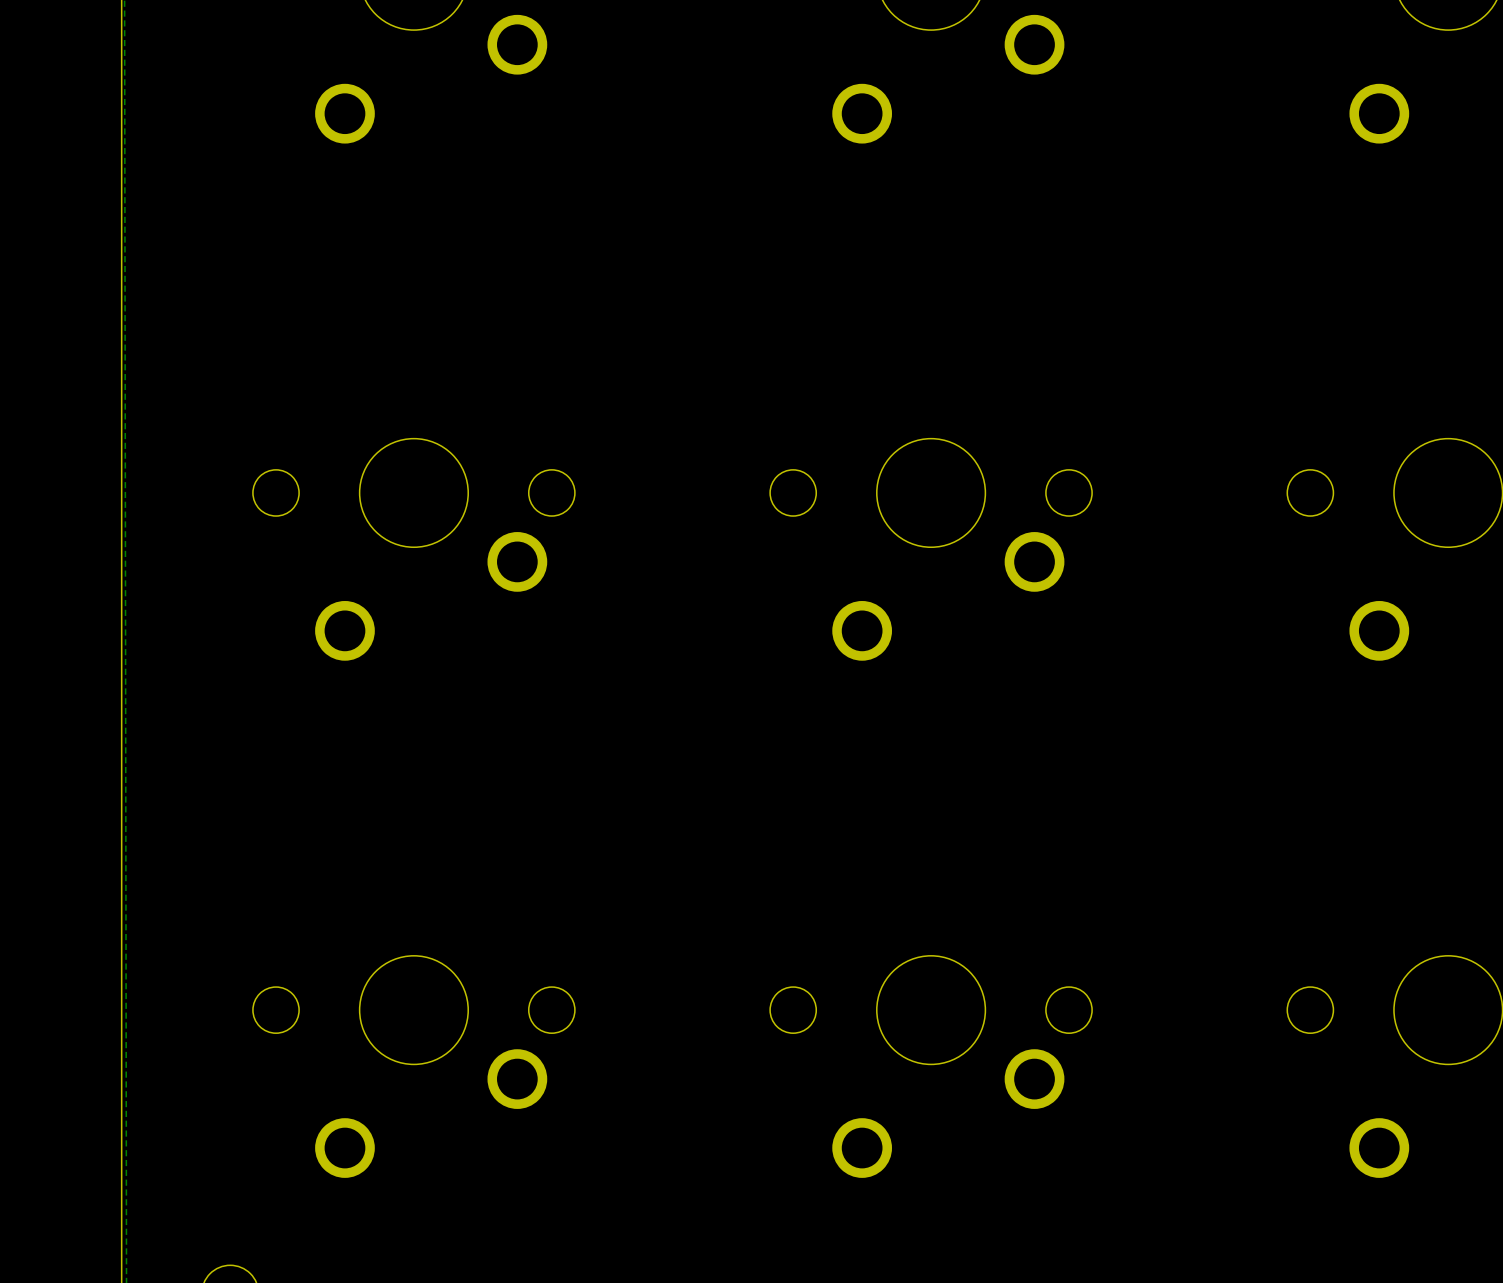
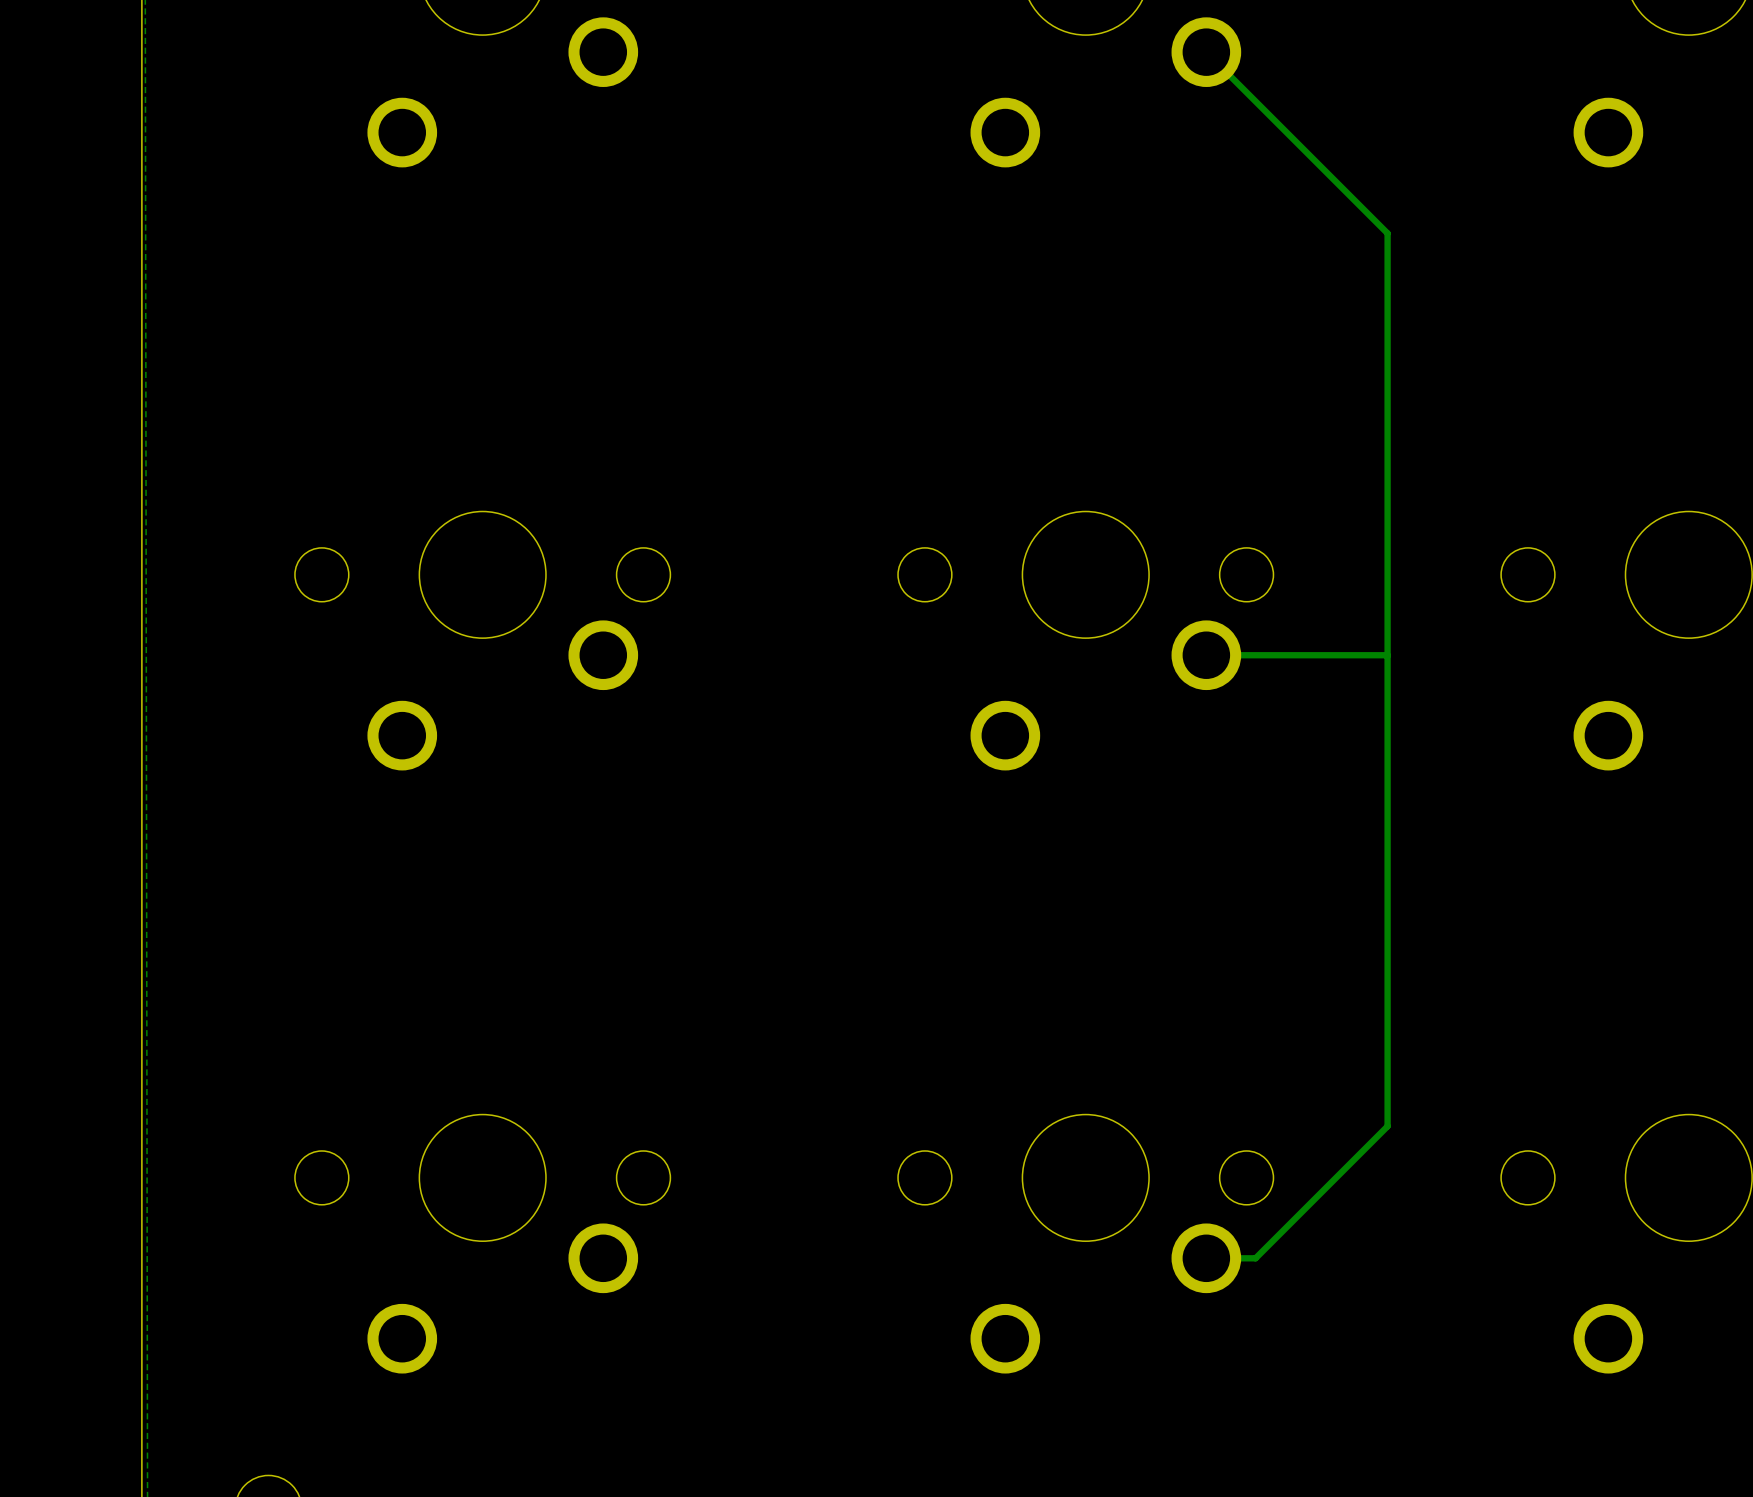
track: none -> (1206, 52) (1387, 233) (1387, 1126) (1255, 1258) (1206, 1258)
track: none -> (1387, 655) (1206, 655)

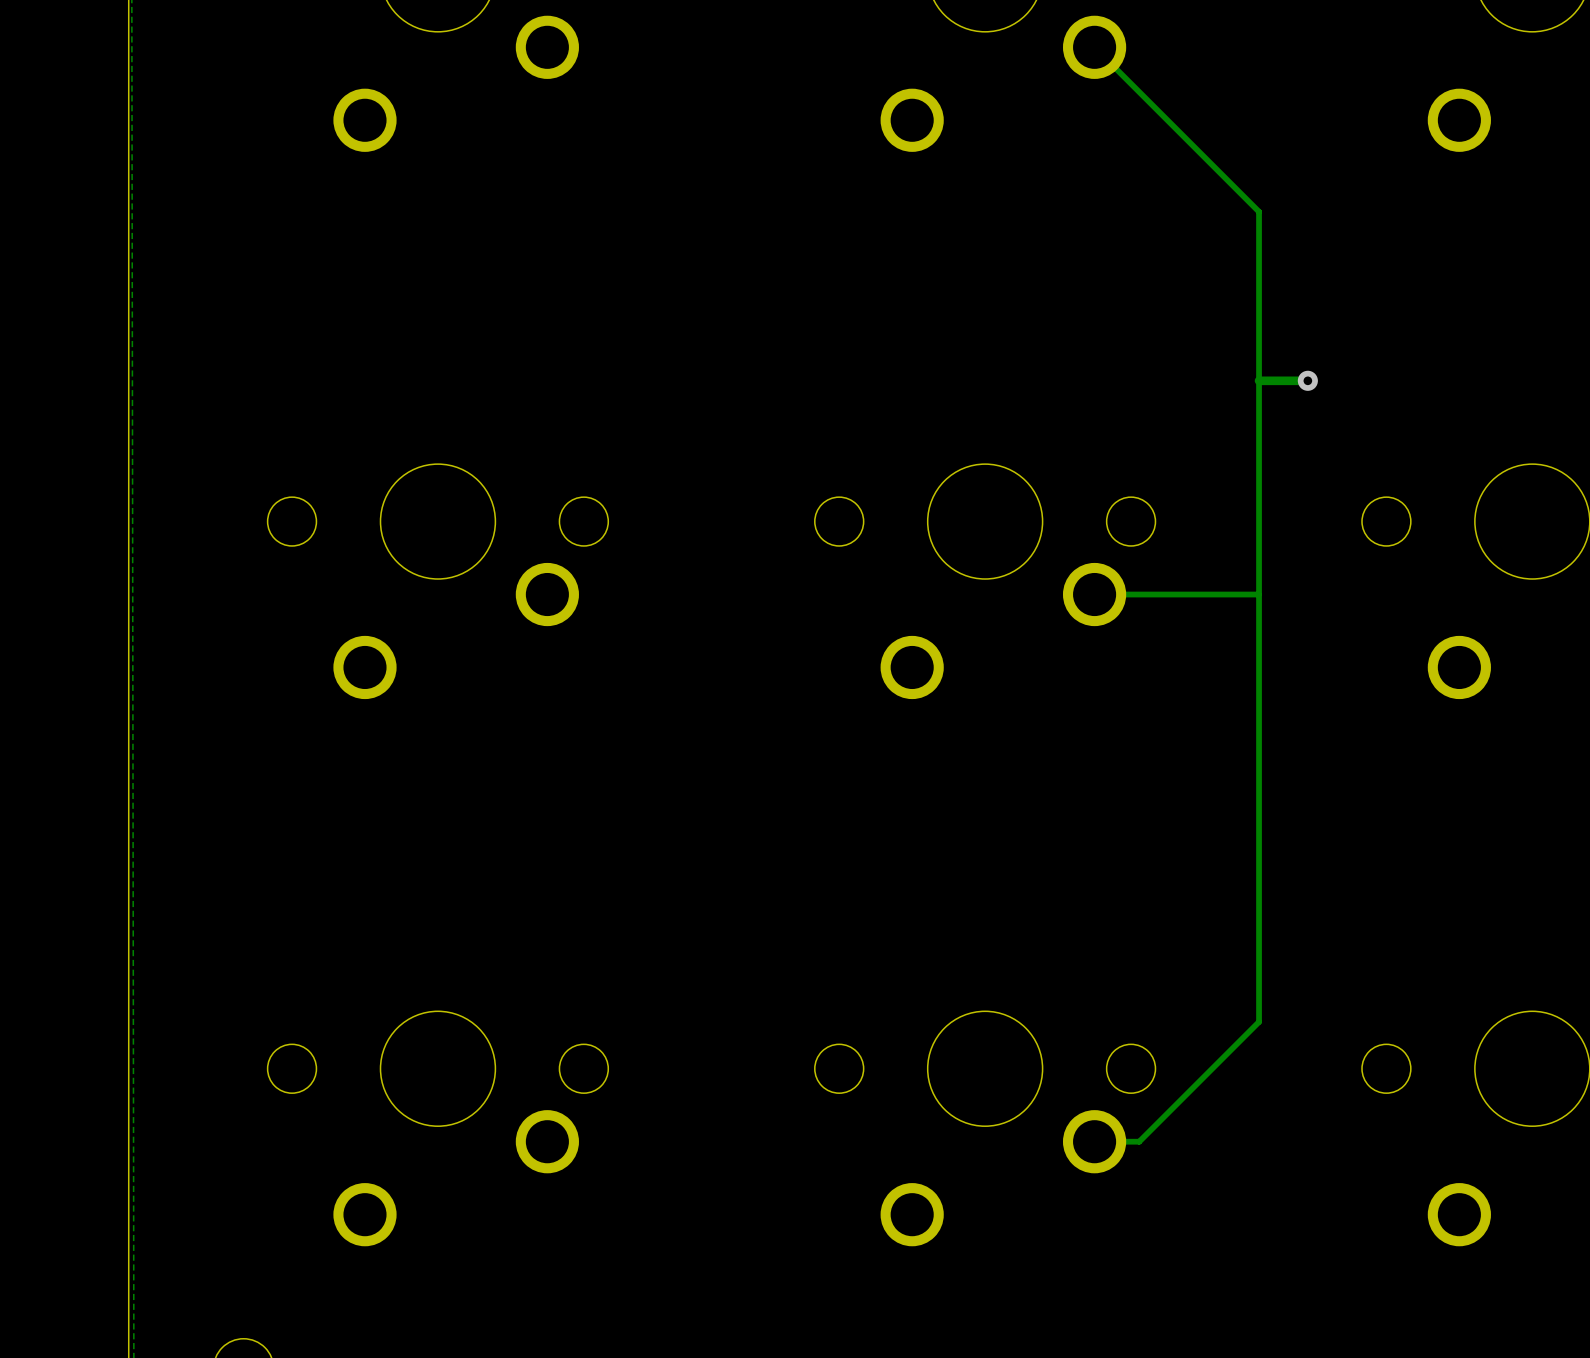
track: none -> (1307, 380) (1259, 380)
via: none -> (1307, 380)

